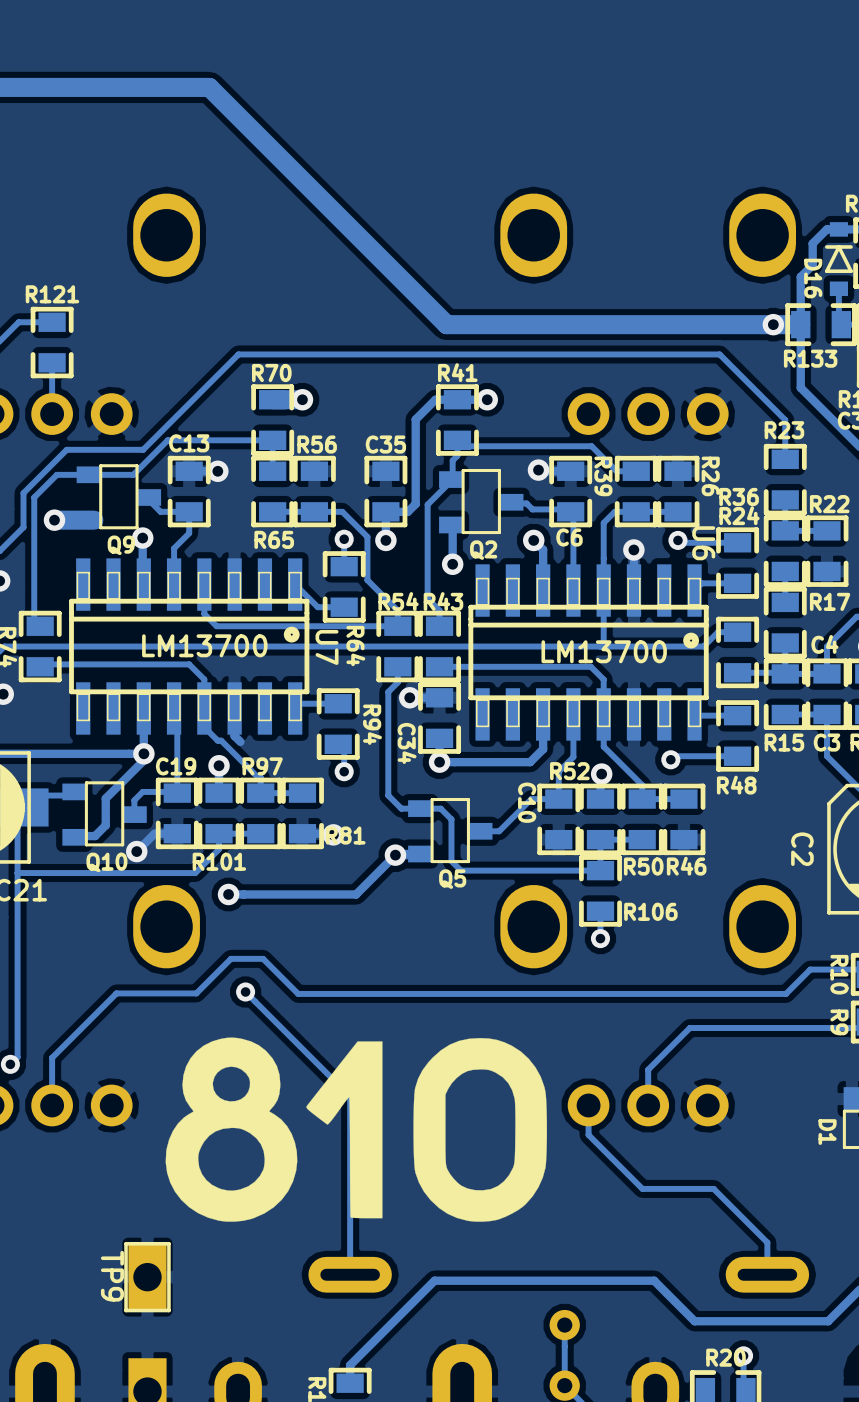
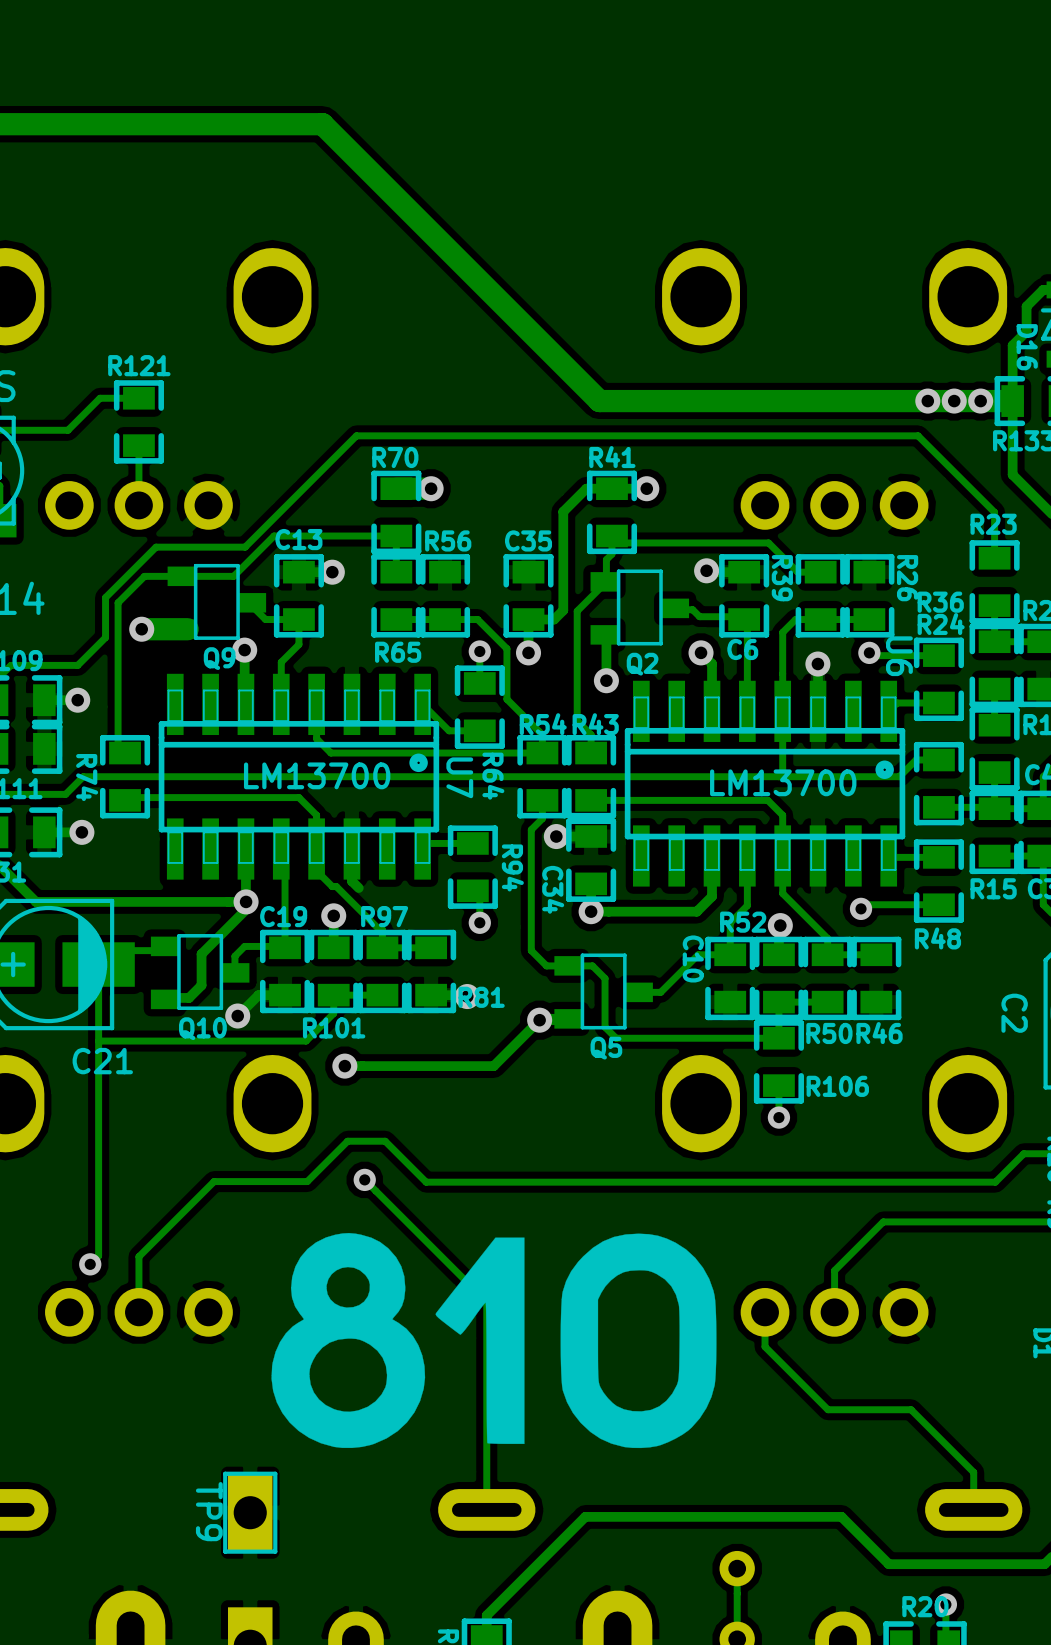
via: none -> (927, 401)
via: none -> (954, 401)

